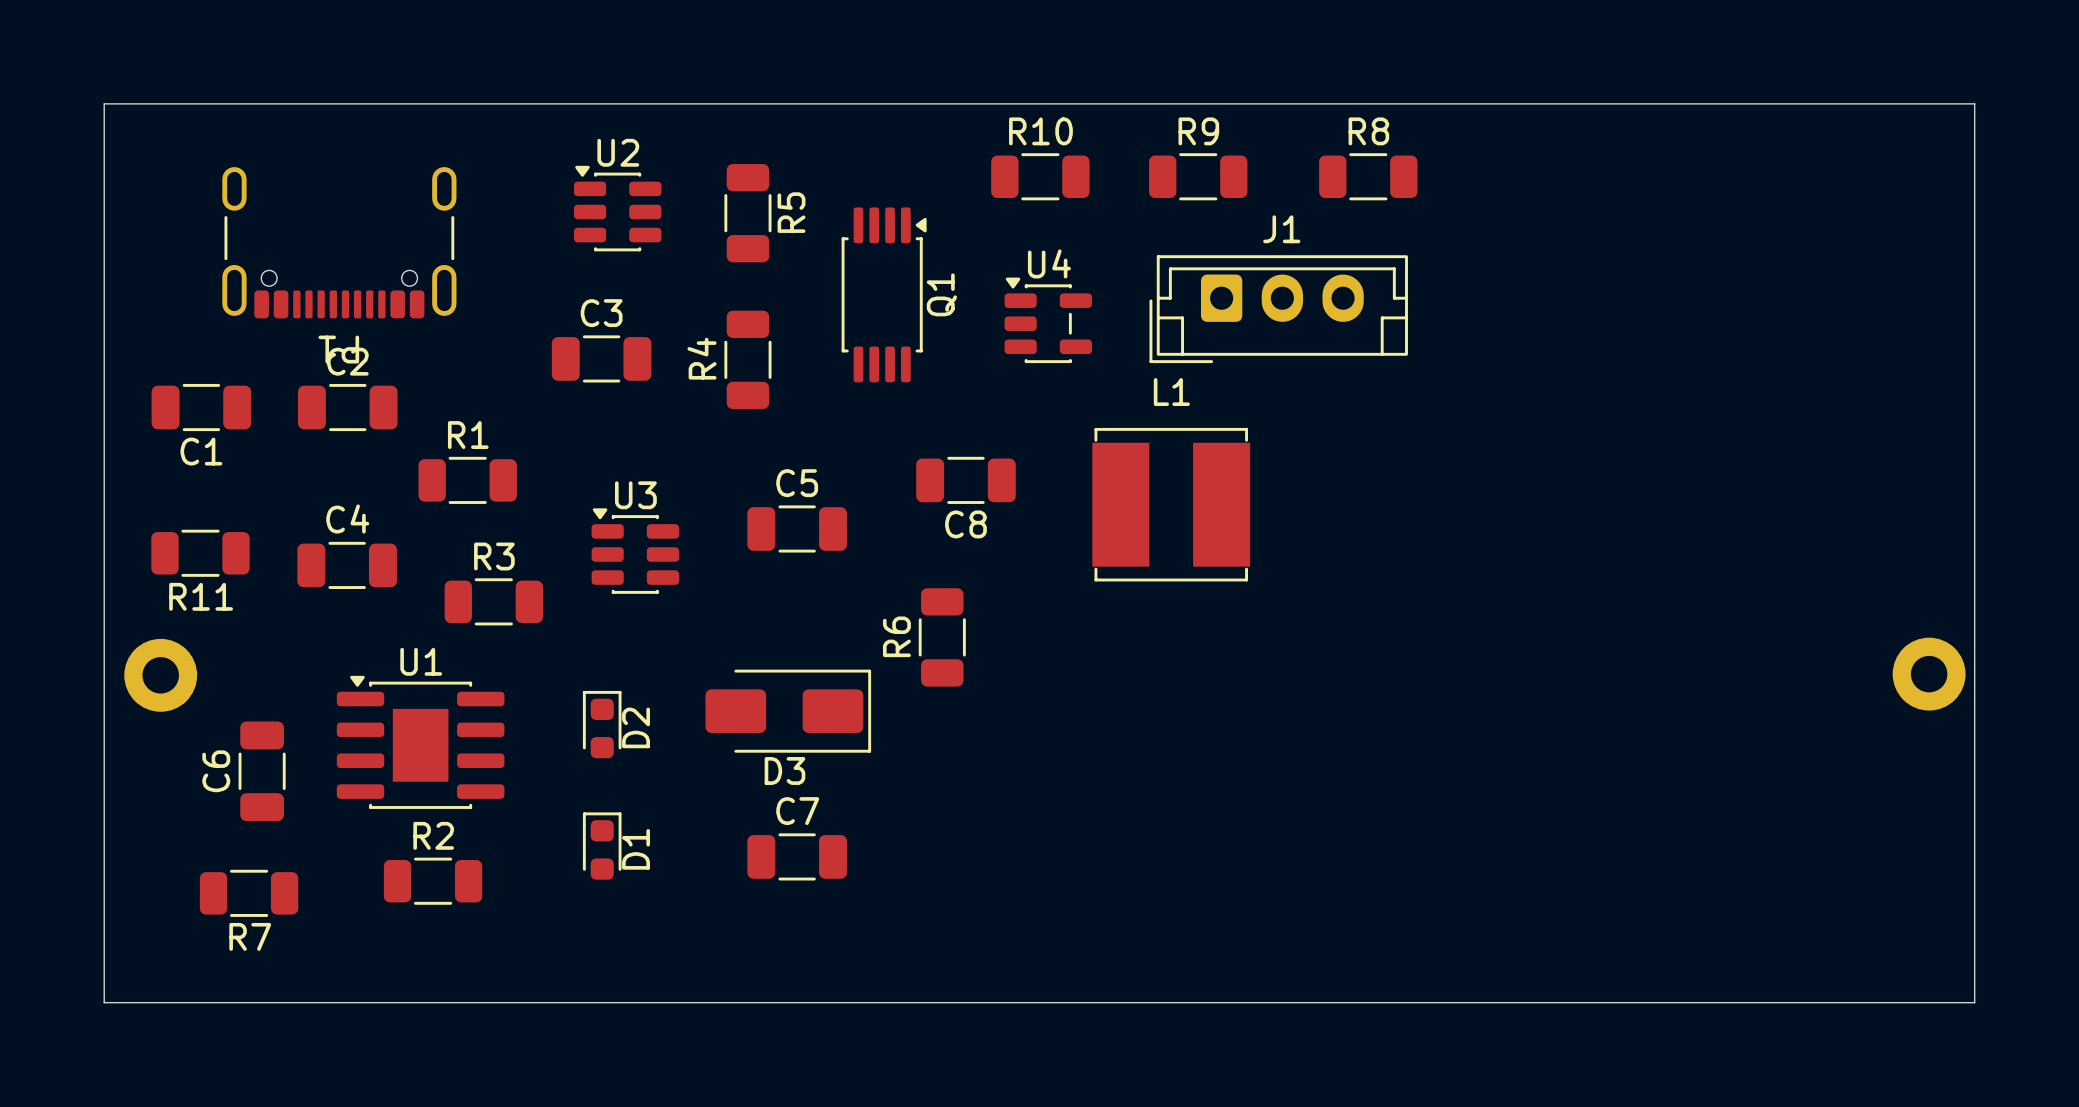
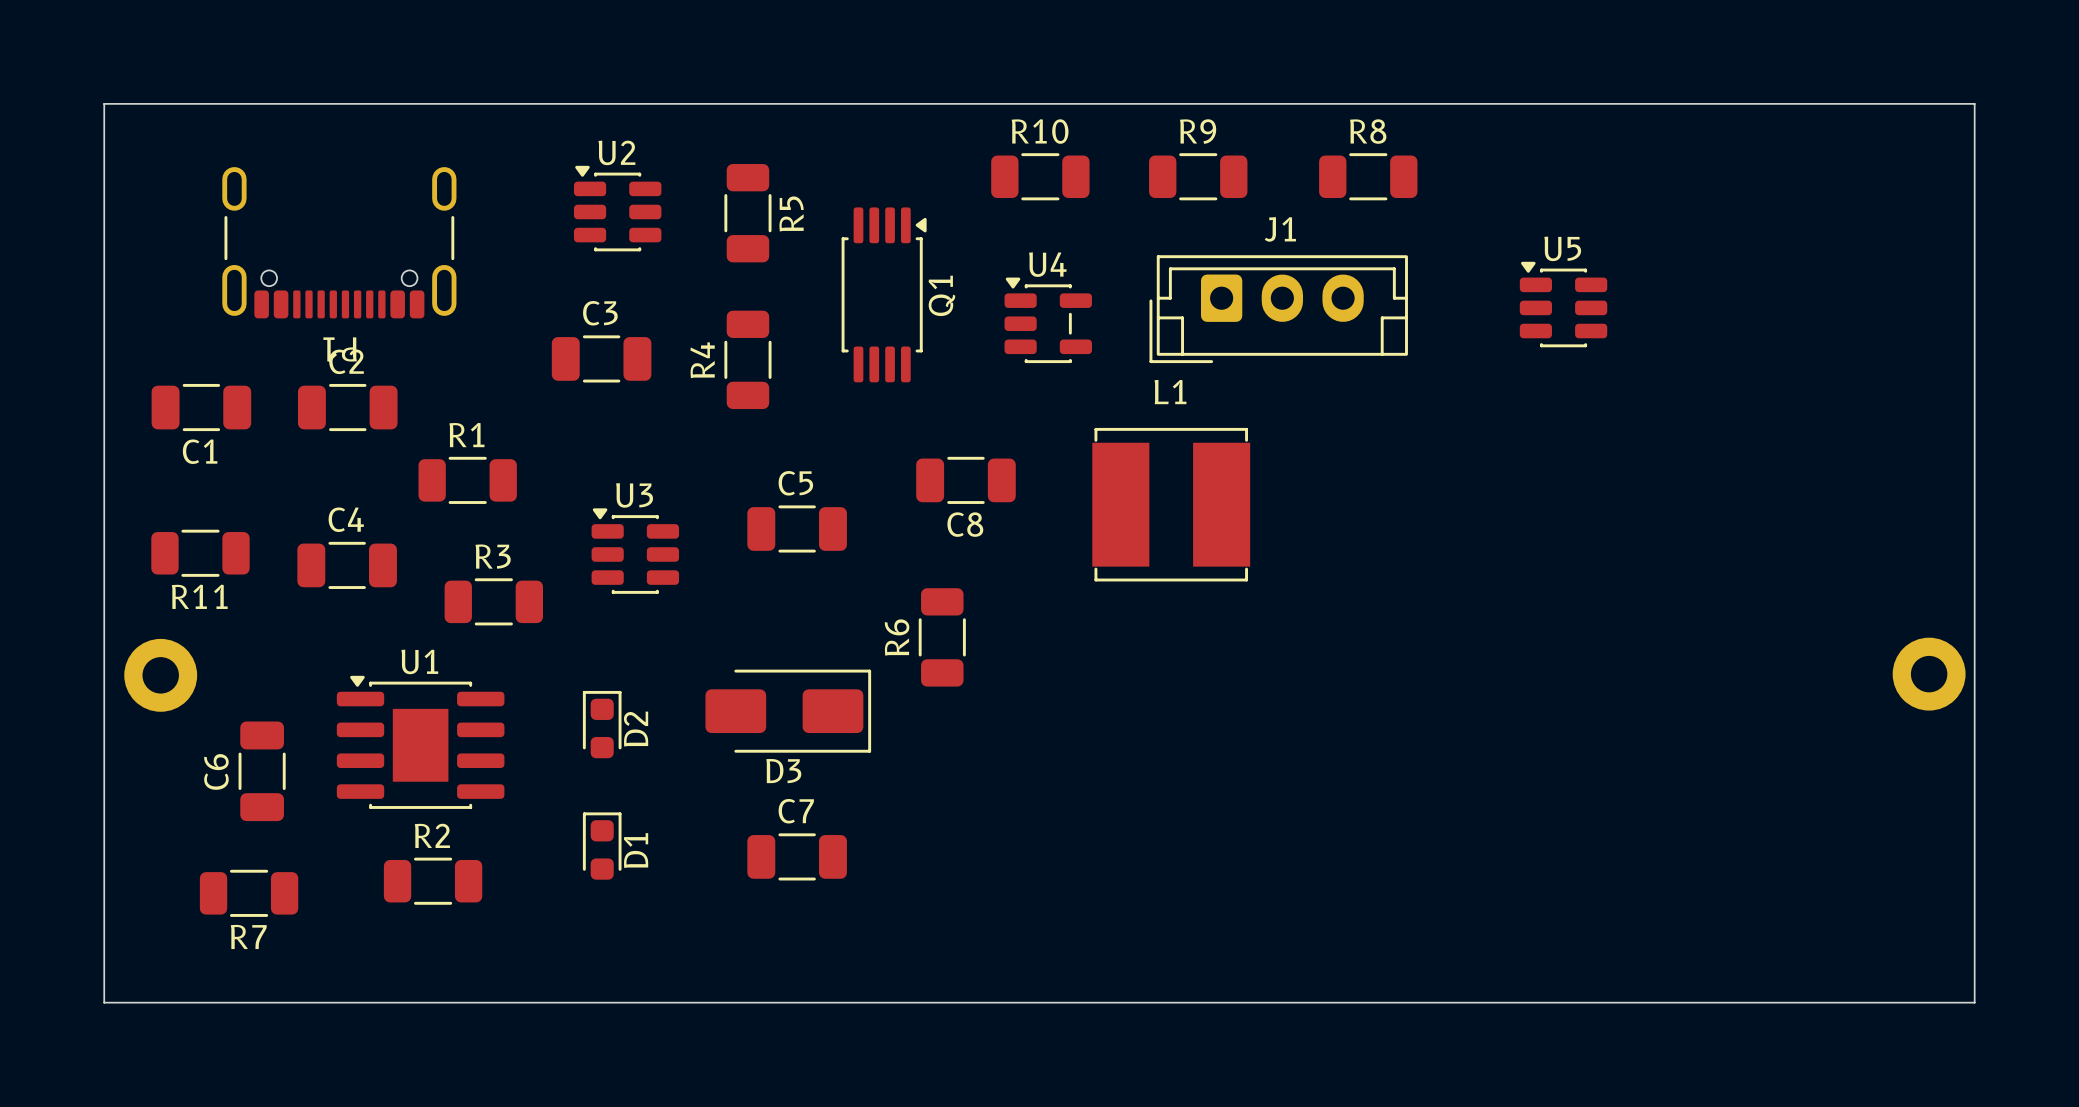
U5: none -> (1563, 304)

